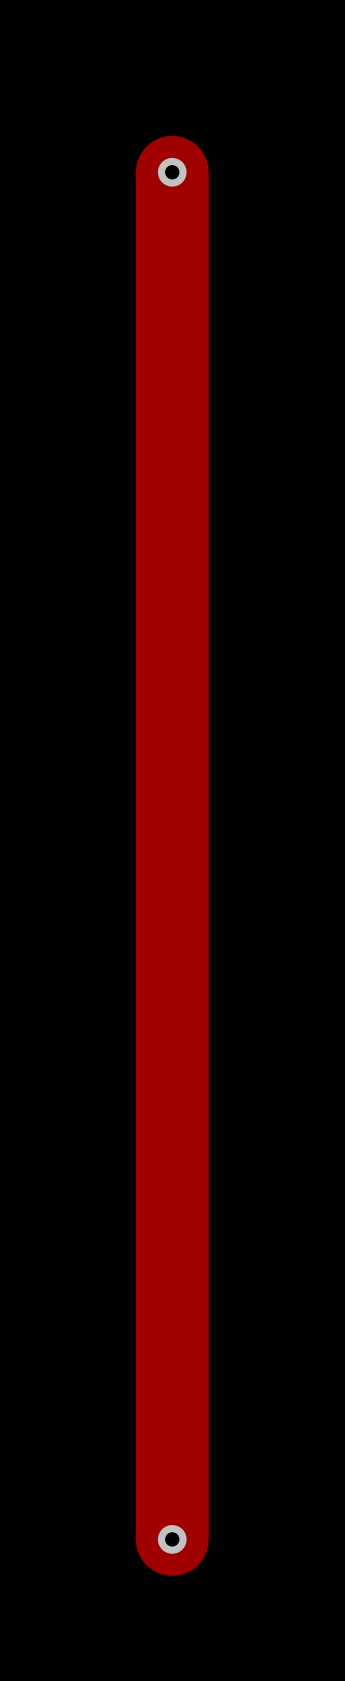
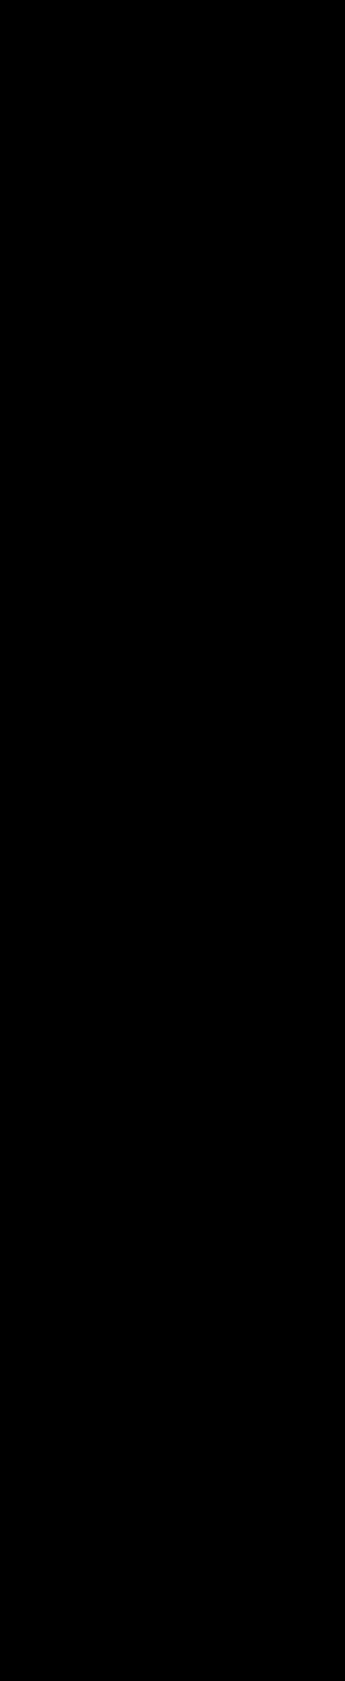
track: (172, 172) (172, 1539) -> none
via: (172, 172) -> none
via: (172, 1539) -> none

